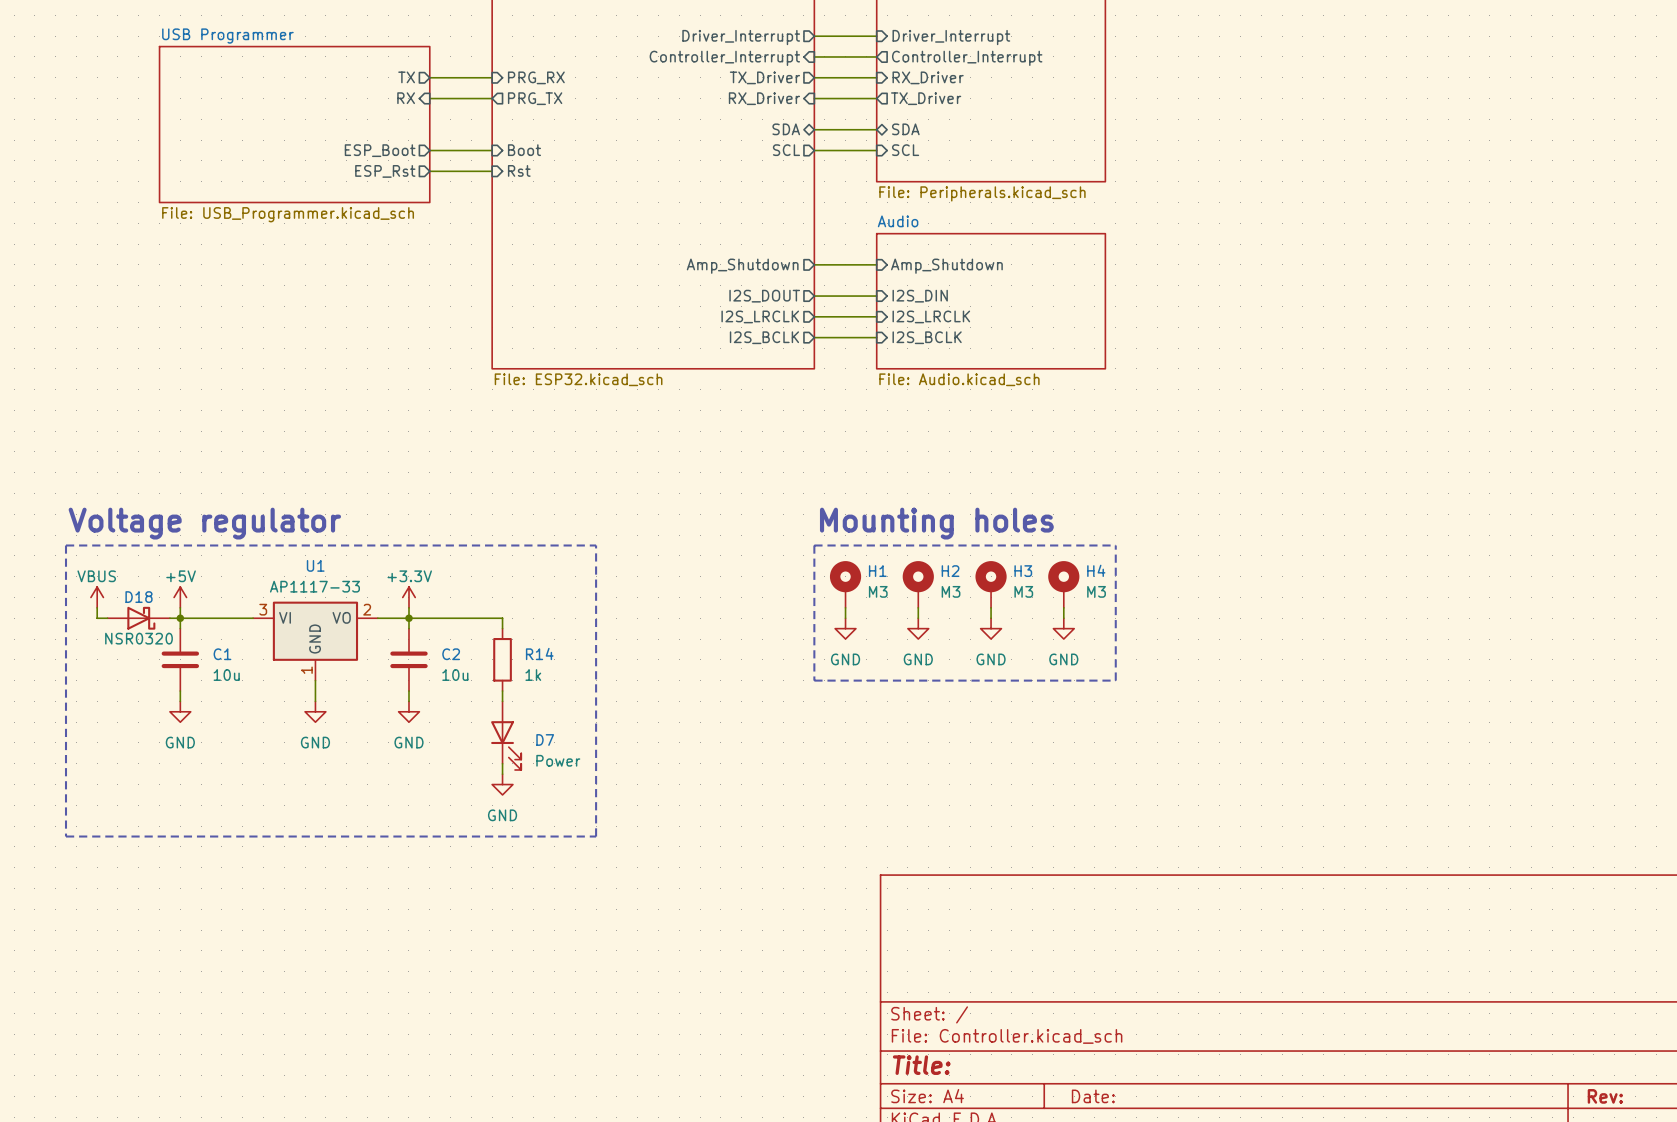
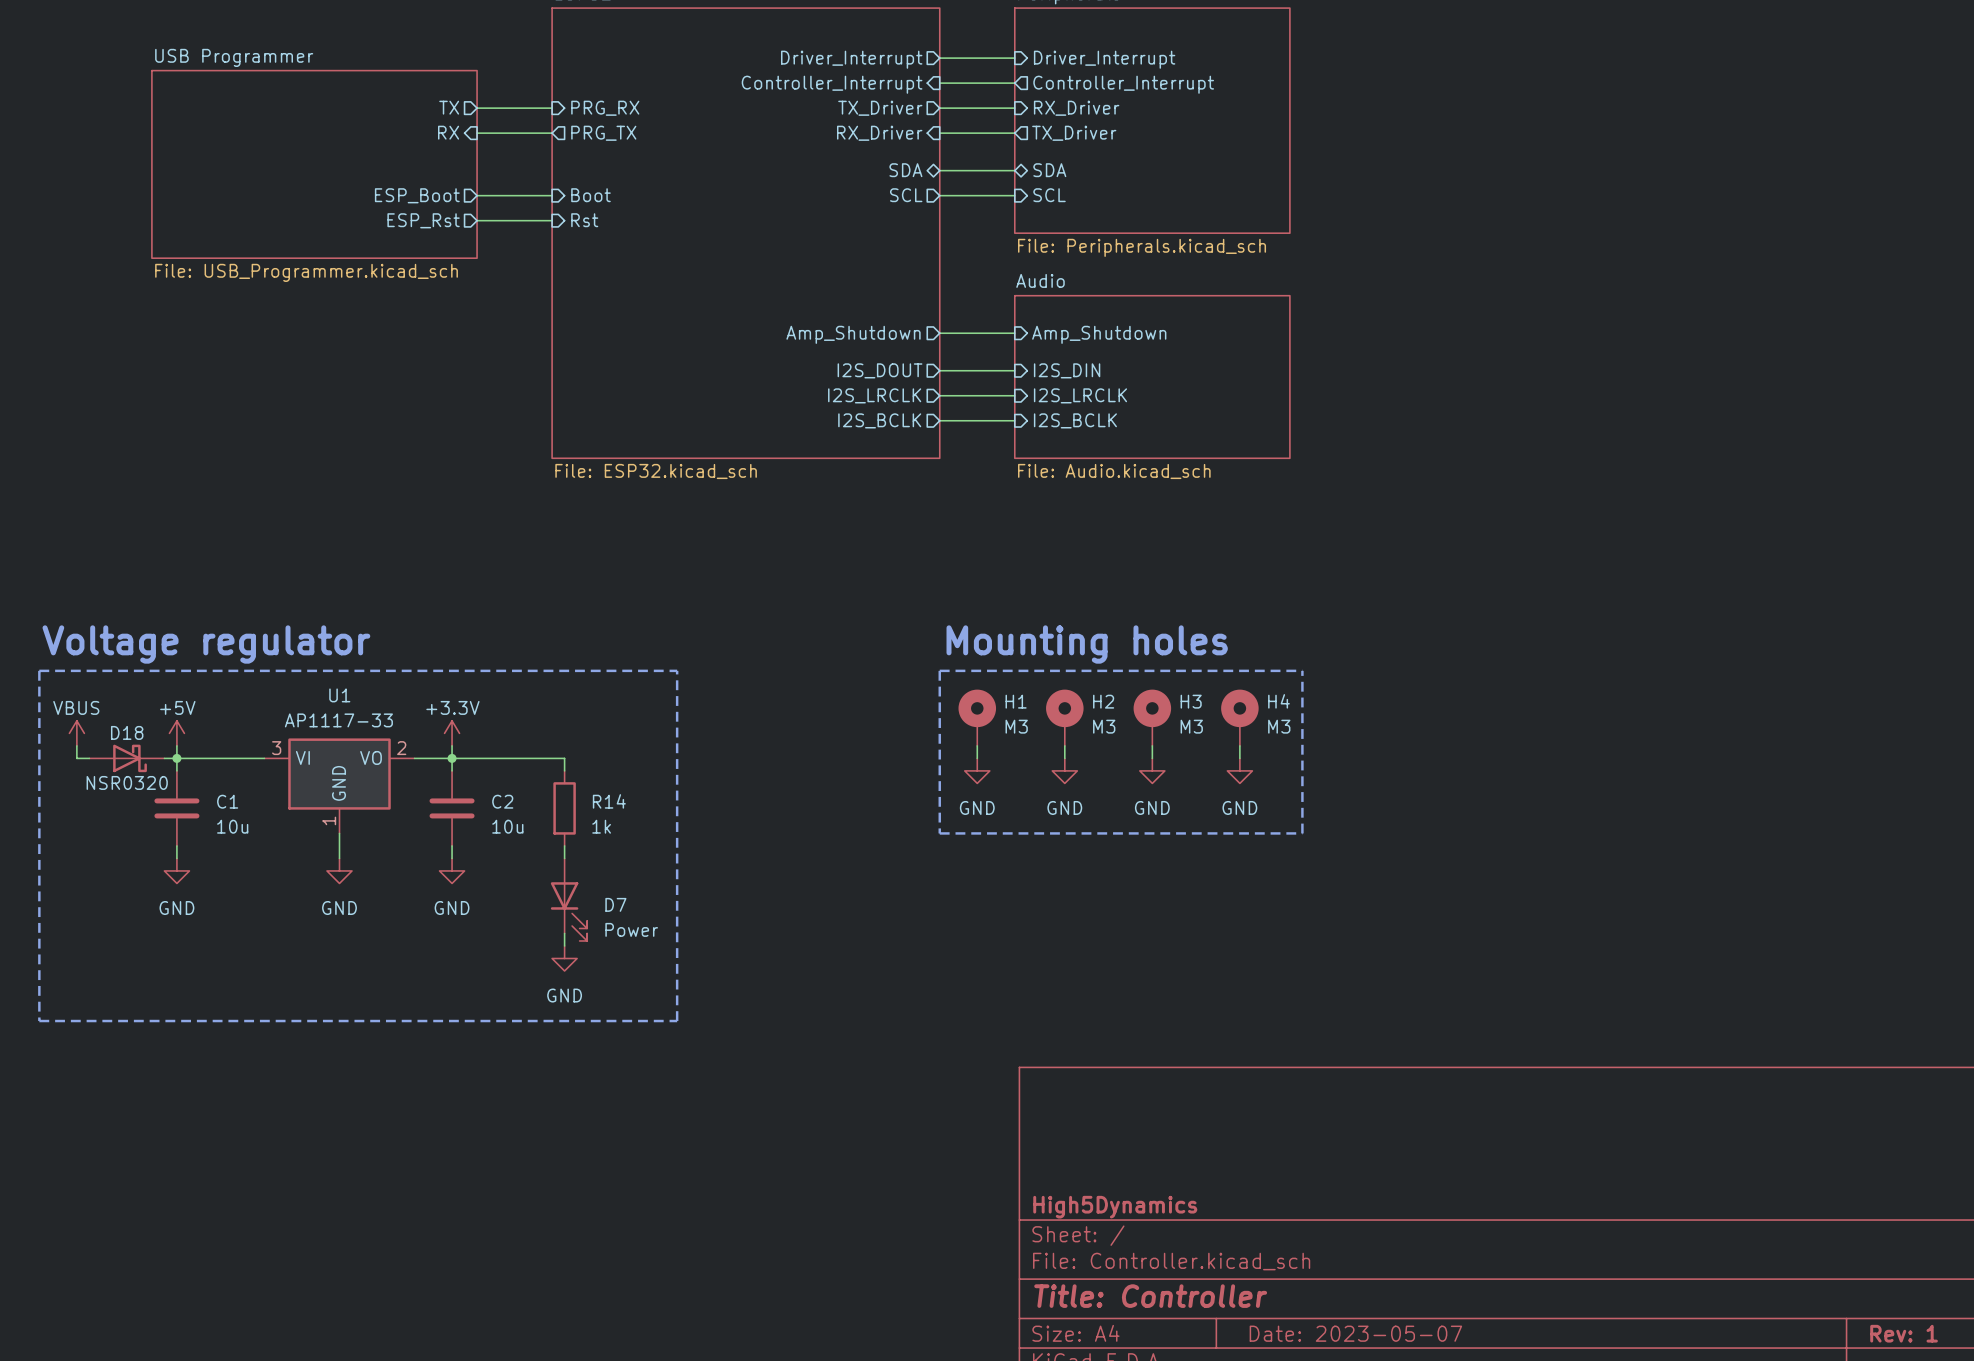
title block: none -> High5Dynamics (1115, 1207)
title block: Title: (921, 1065) -> Title: Controller (1150, 1296)
title block: Date: (1093, 1096) -> Date: 2023-05-07 (1355, 1333)
title block: Rev: (1605, 1096) -> Rev: 1 (1904, 1333)

